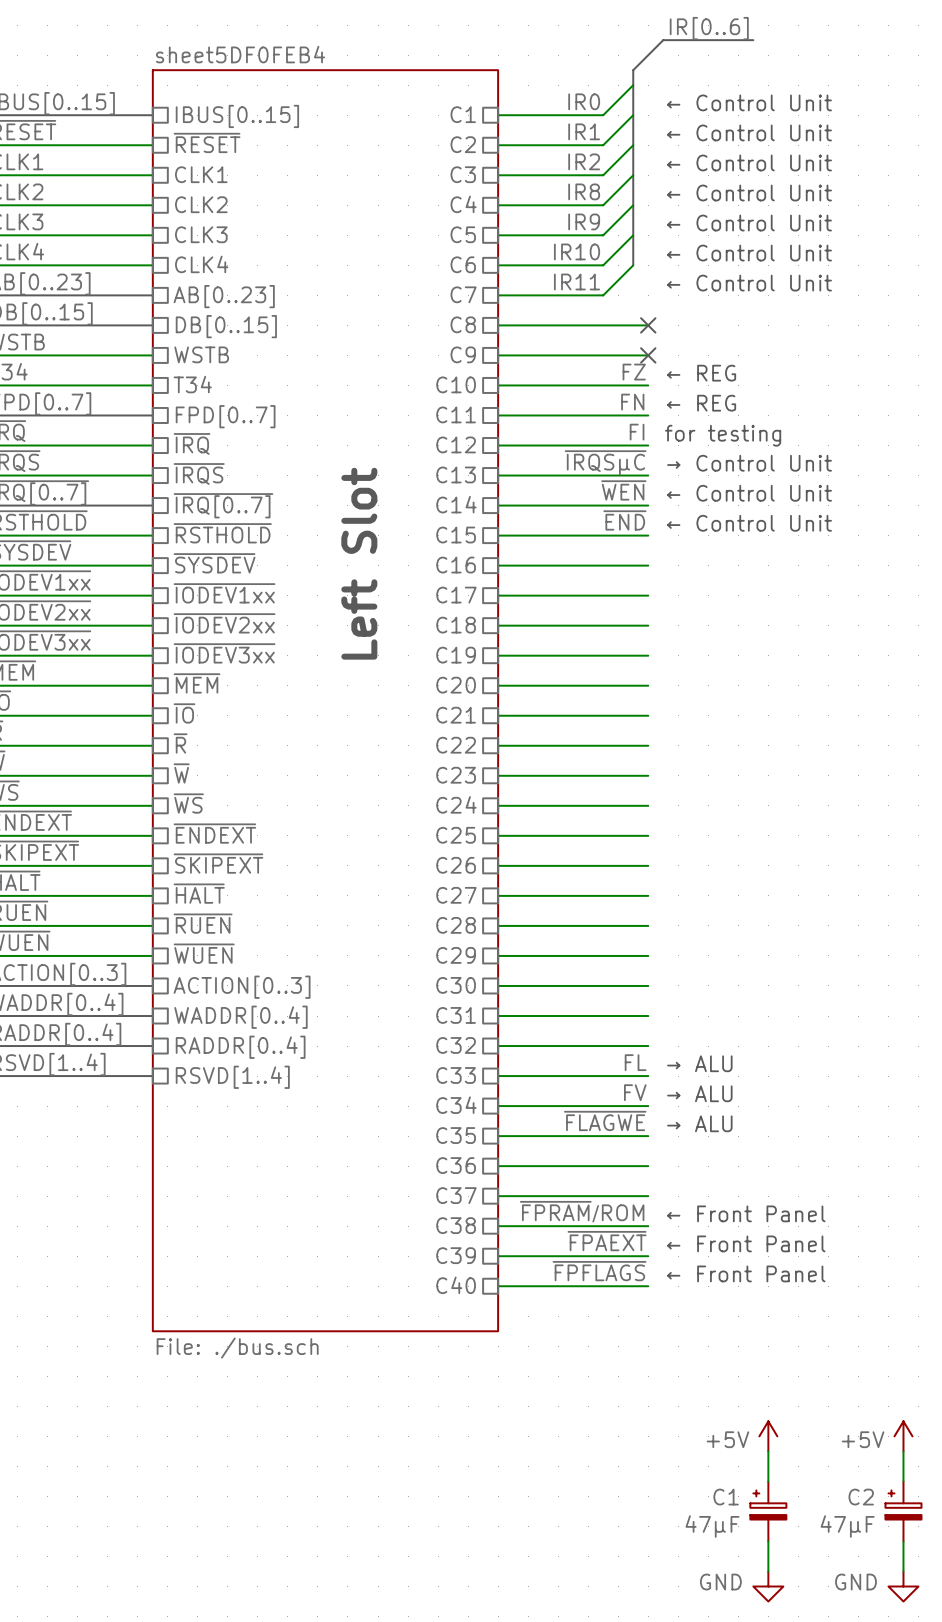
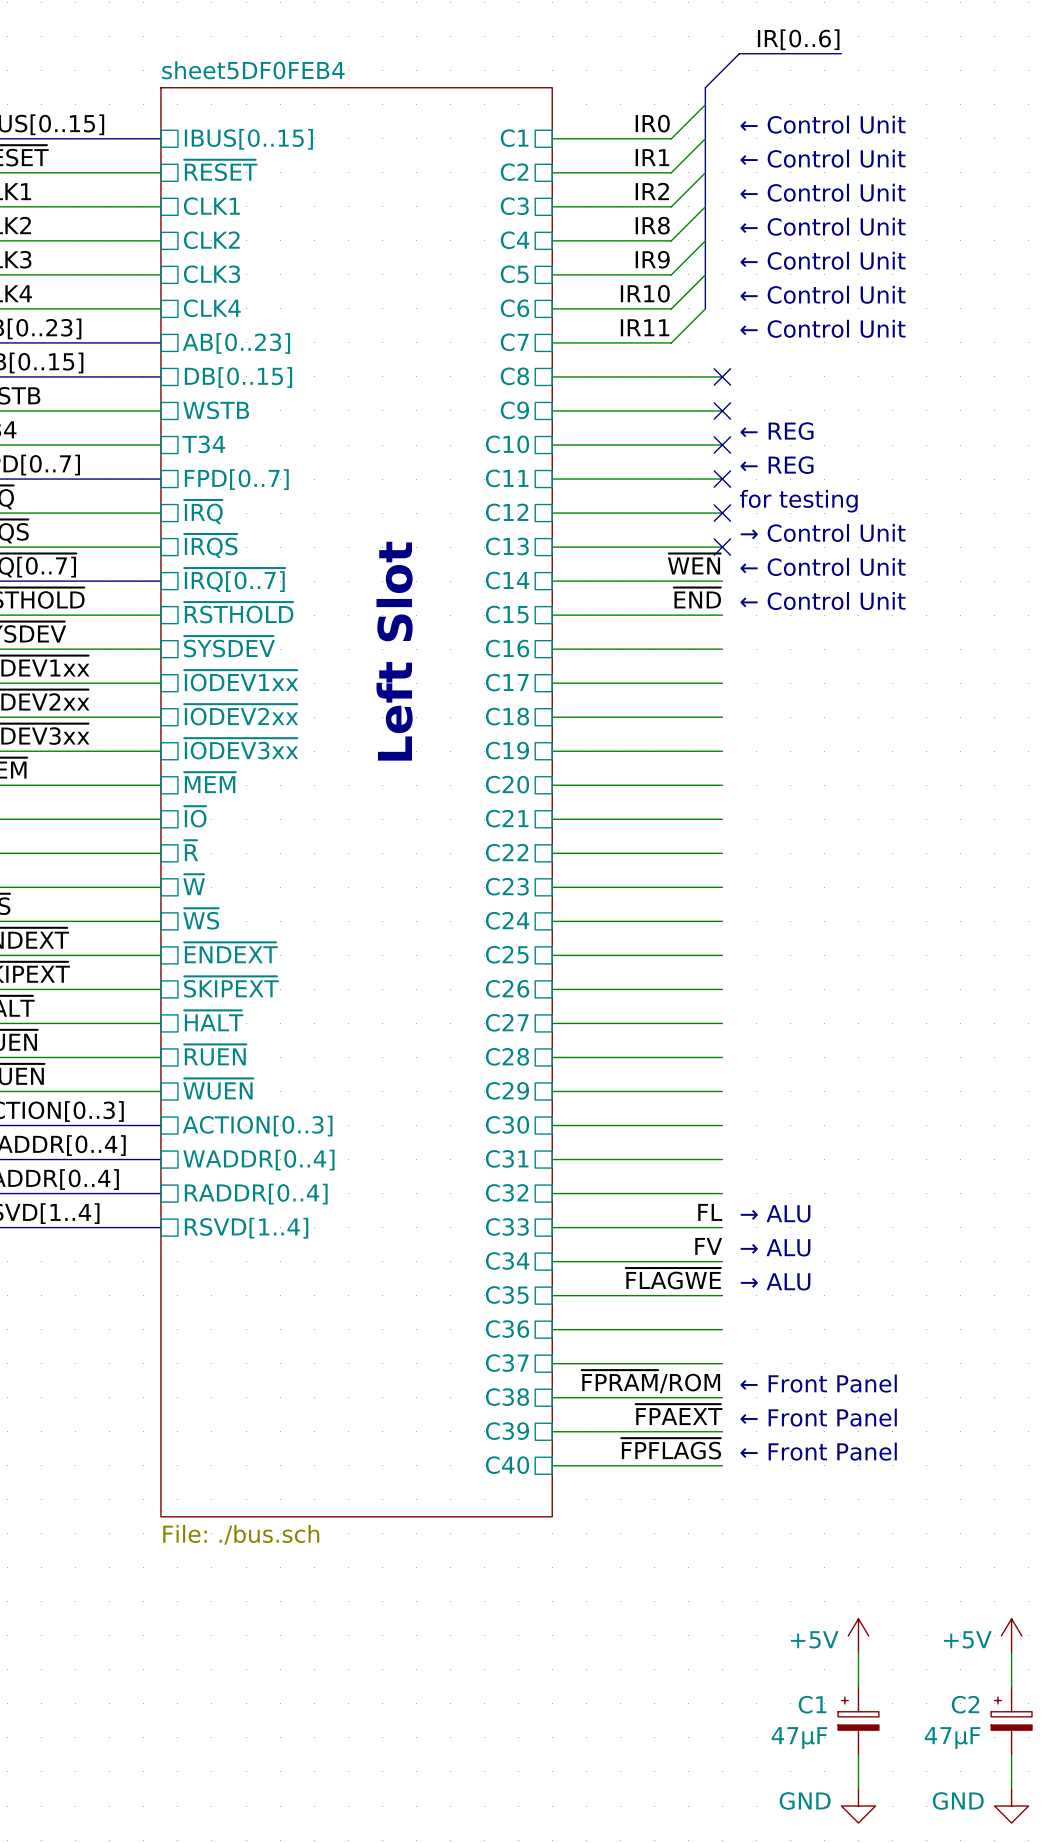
label: FZ (634, 372) -> none
no-connect mark: none -> (722, 445)
label: FN (632, 402) -> none
no-connect mark: none -> (722, 479)
label: FI (637, 432) -> none
no-connect mark: none -> (722, 513)
label: ~{IRQSµC} (605, 462) -> none
no-connect mark: none -> (722, 547)

